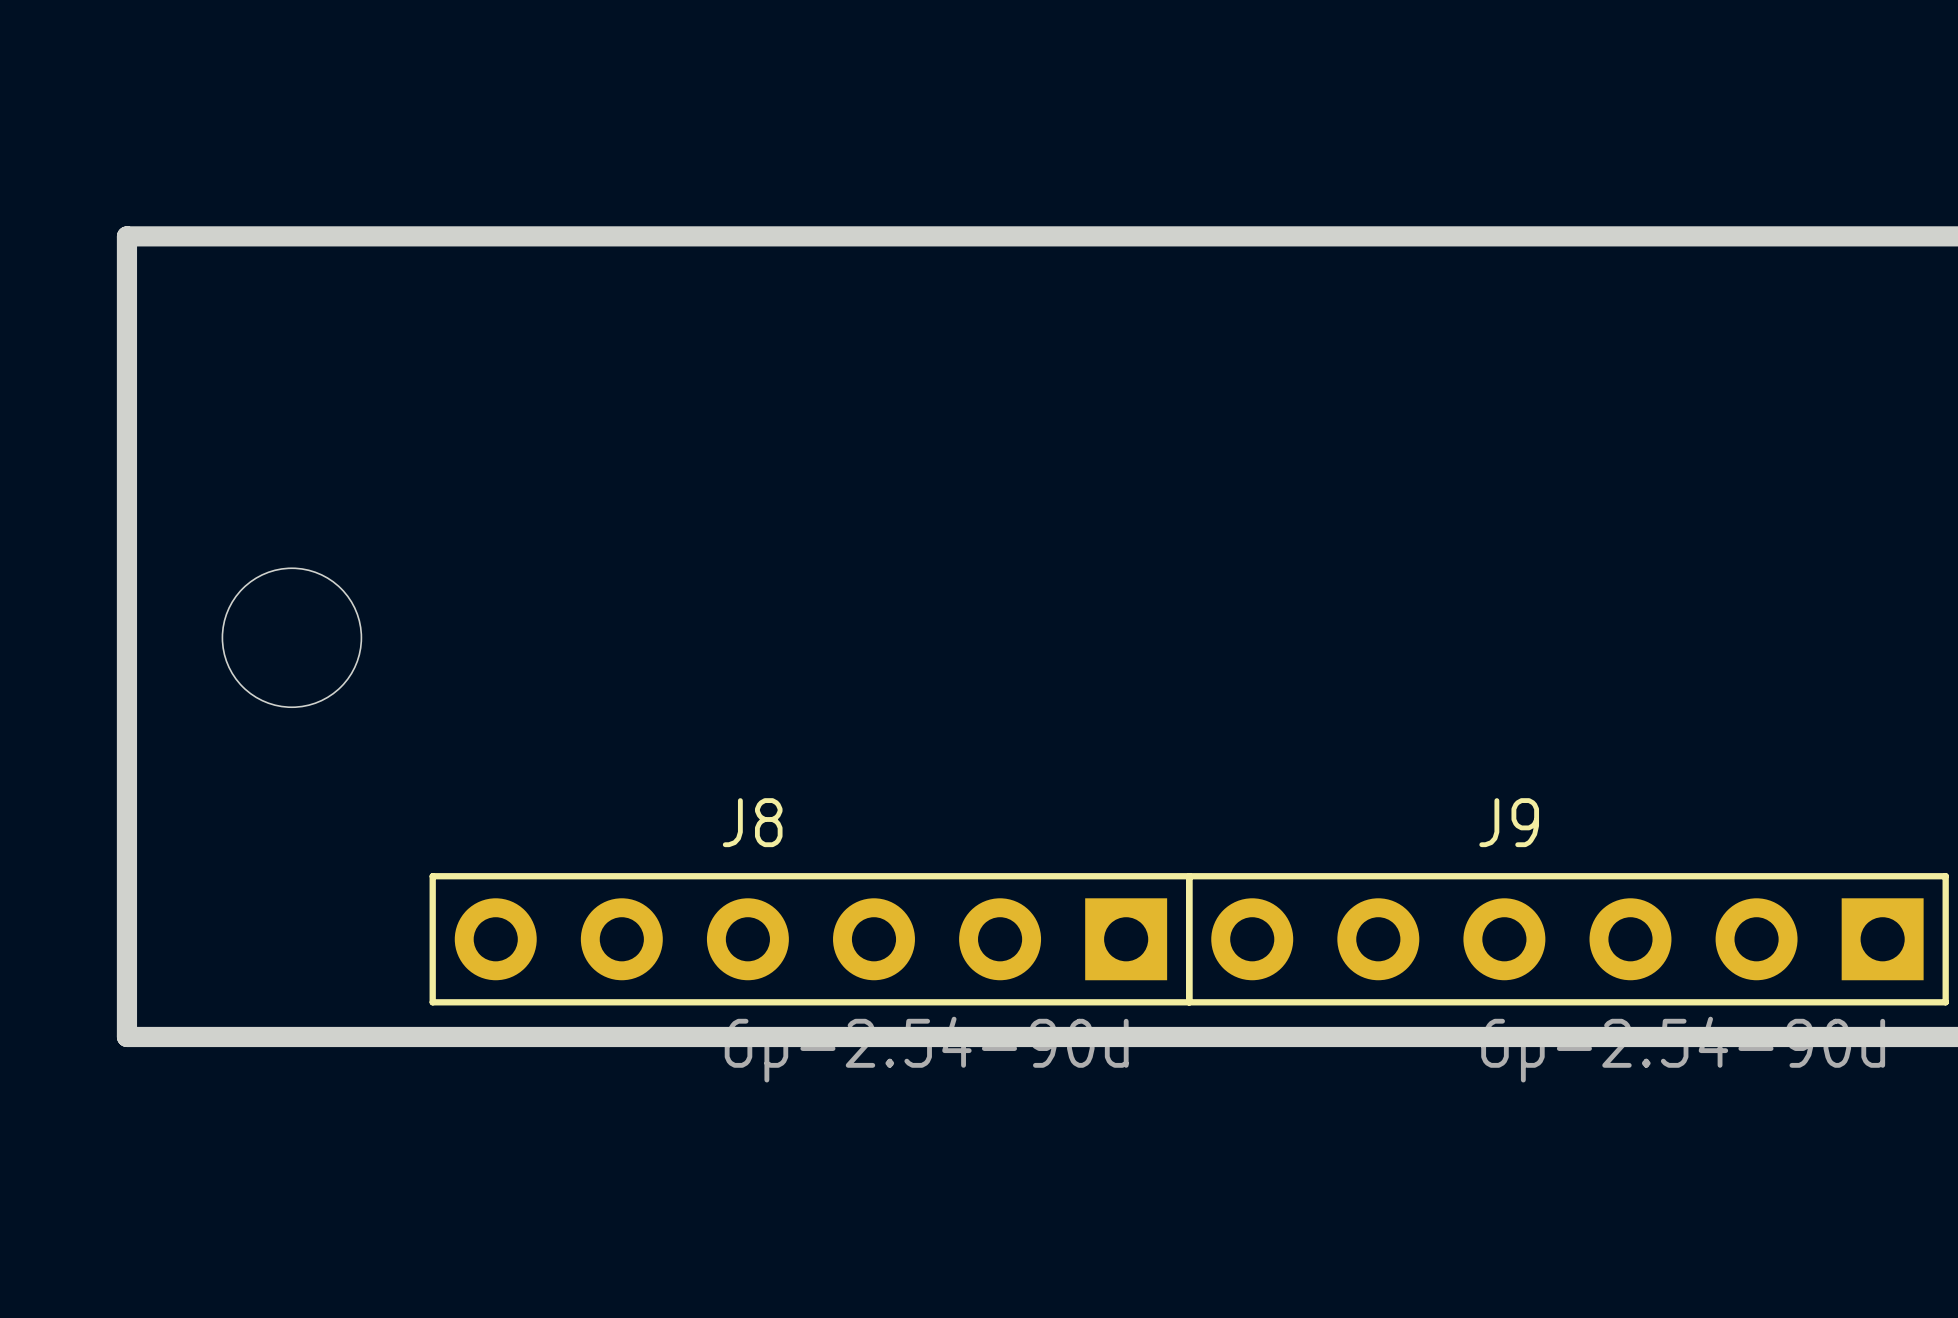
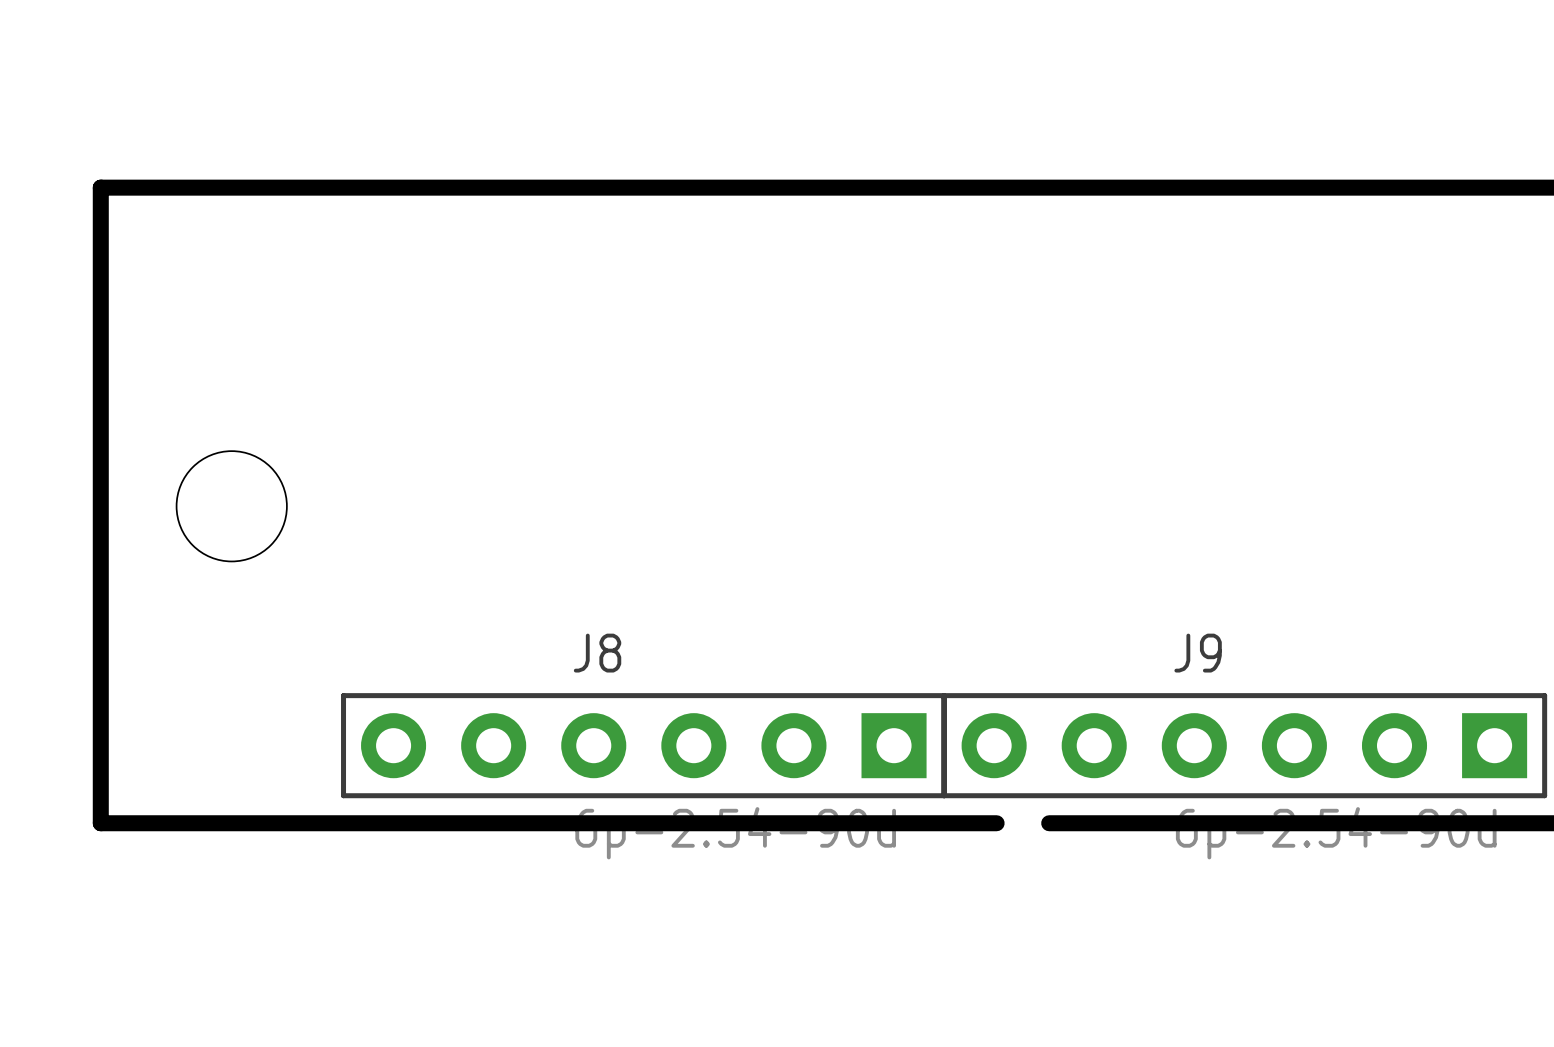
board edge: (1321, 1036) (1255, 1036) -> none

